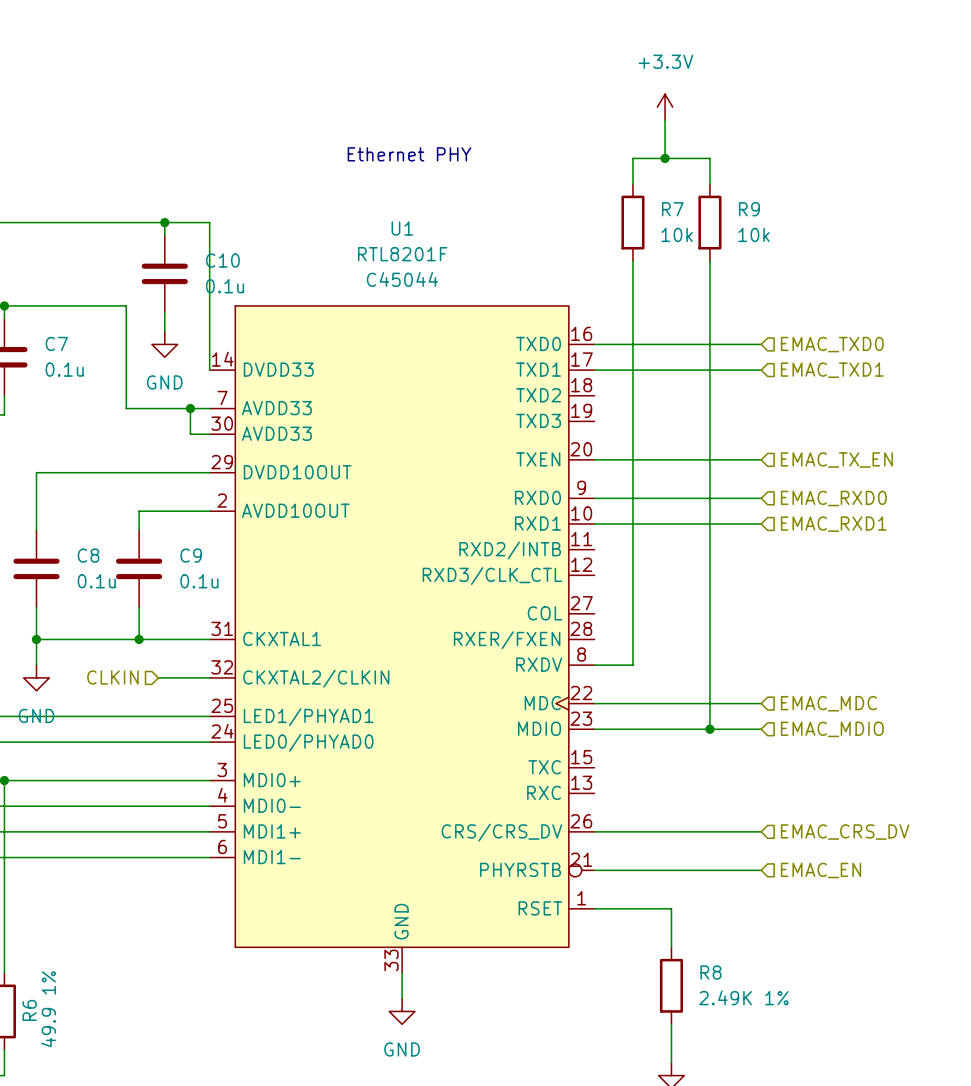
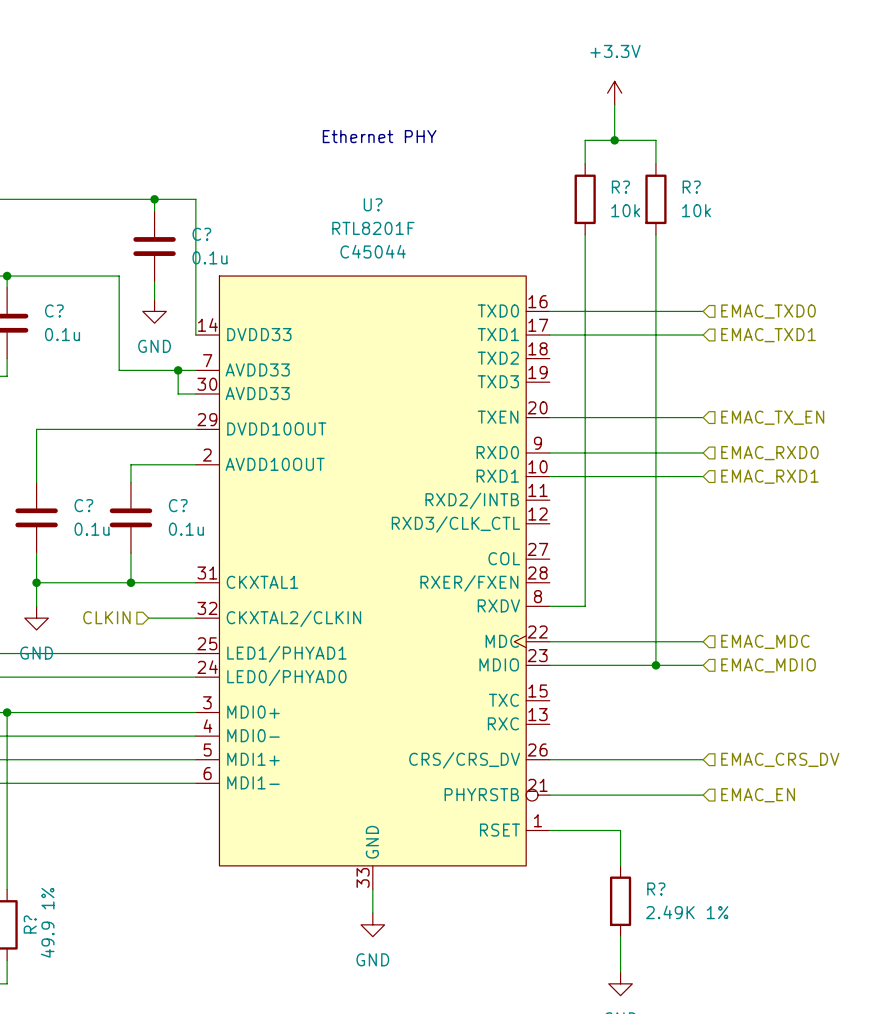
R7 name: R7 (672, 209) -> R? (620, 187)
R9 name: R9 (749, 209) -> R? (691, 187)
U1 name: U1 (402, 228) -> U? (373, 204)
C10 name: C10 (222, 260) -> C? (201, 234)
C7 name: C7 (56, 343) -> C? (54, 310)
C8 name: C8 (88, 555) -> C? (83, 505)
C9 name: C9 (191, 555) -> C? (178, 505)
R8 name: R8 (710, 972) -> R? (656, 889)
R6 name: R6 (29, 1010) -> R? (30, 924)

